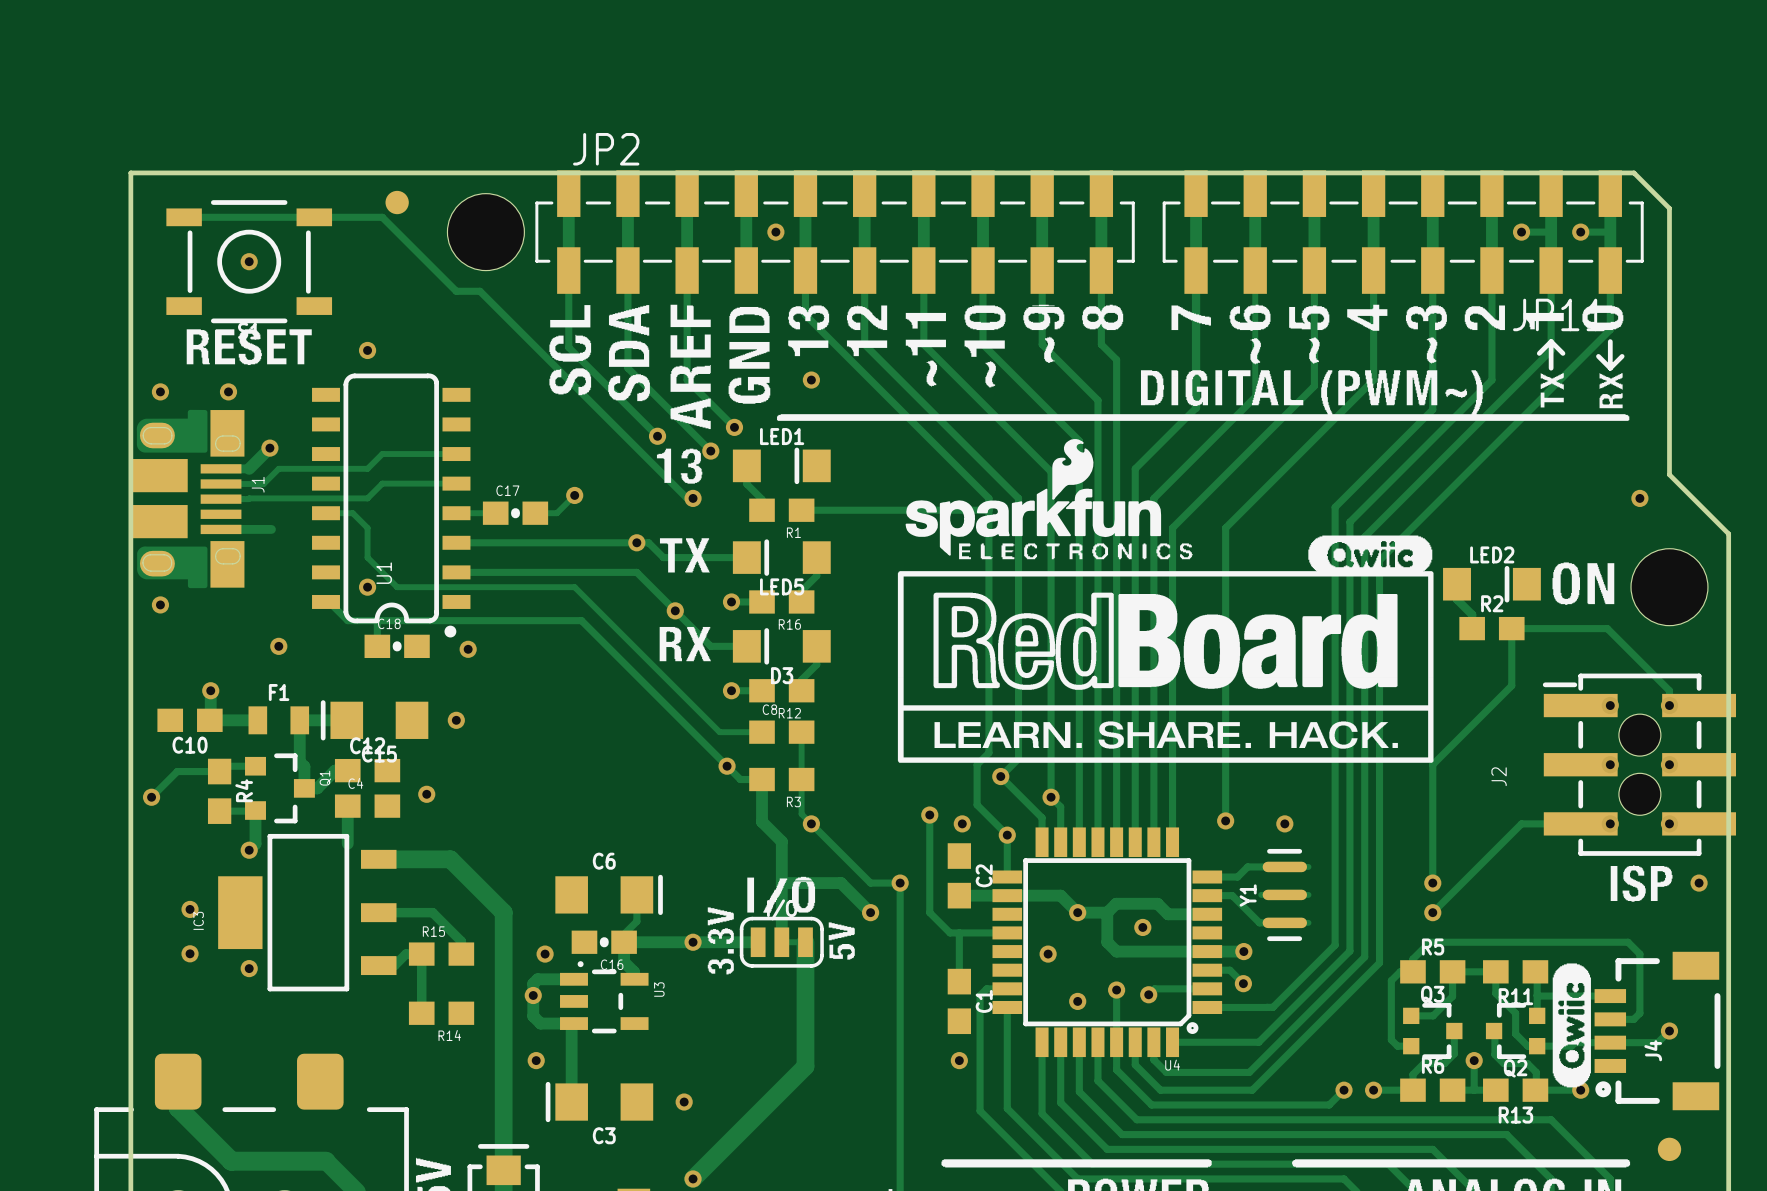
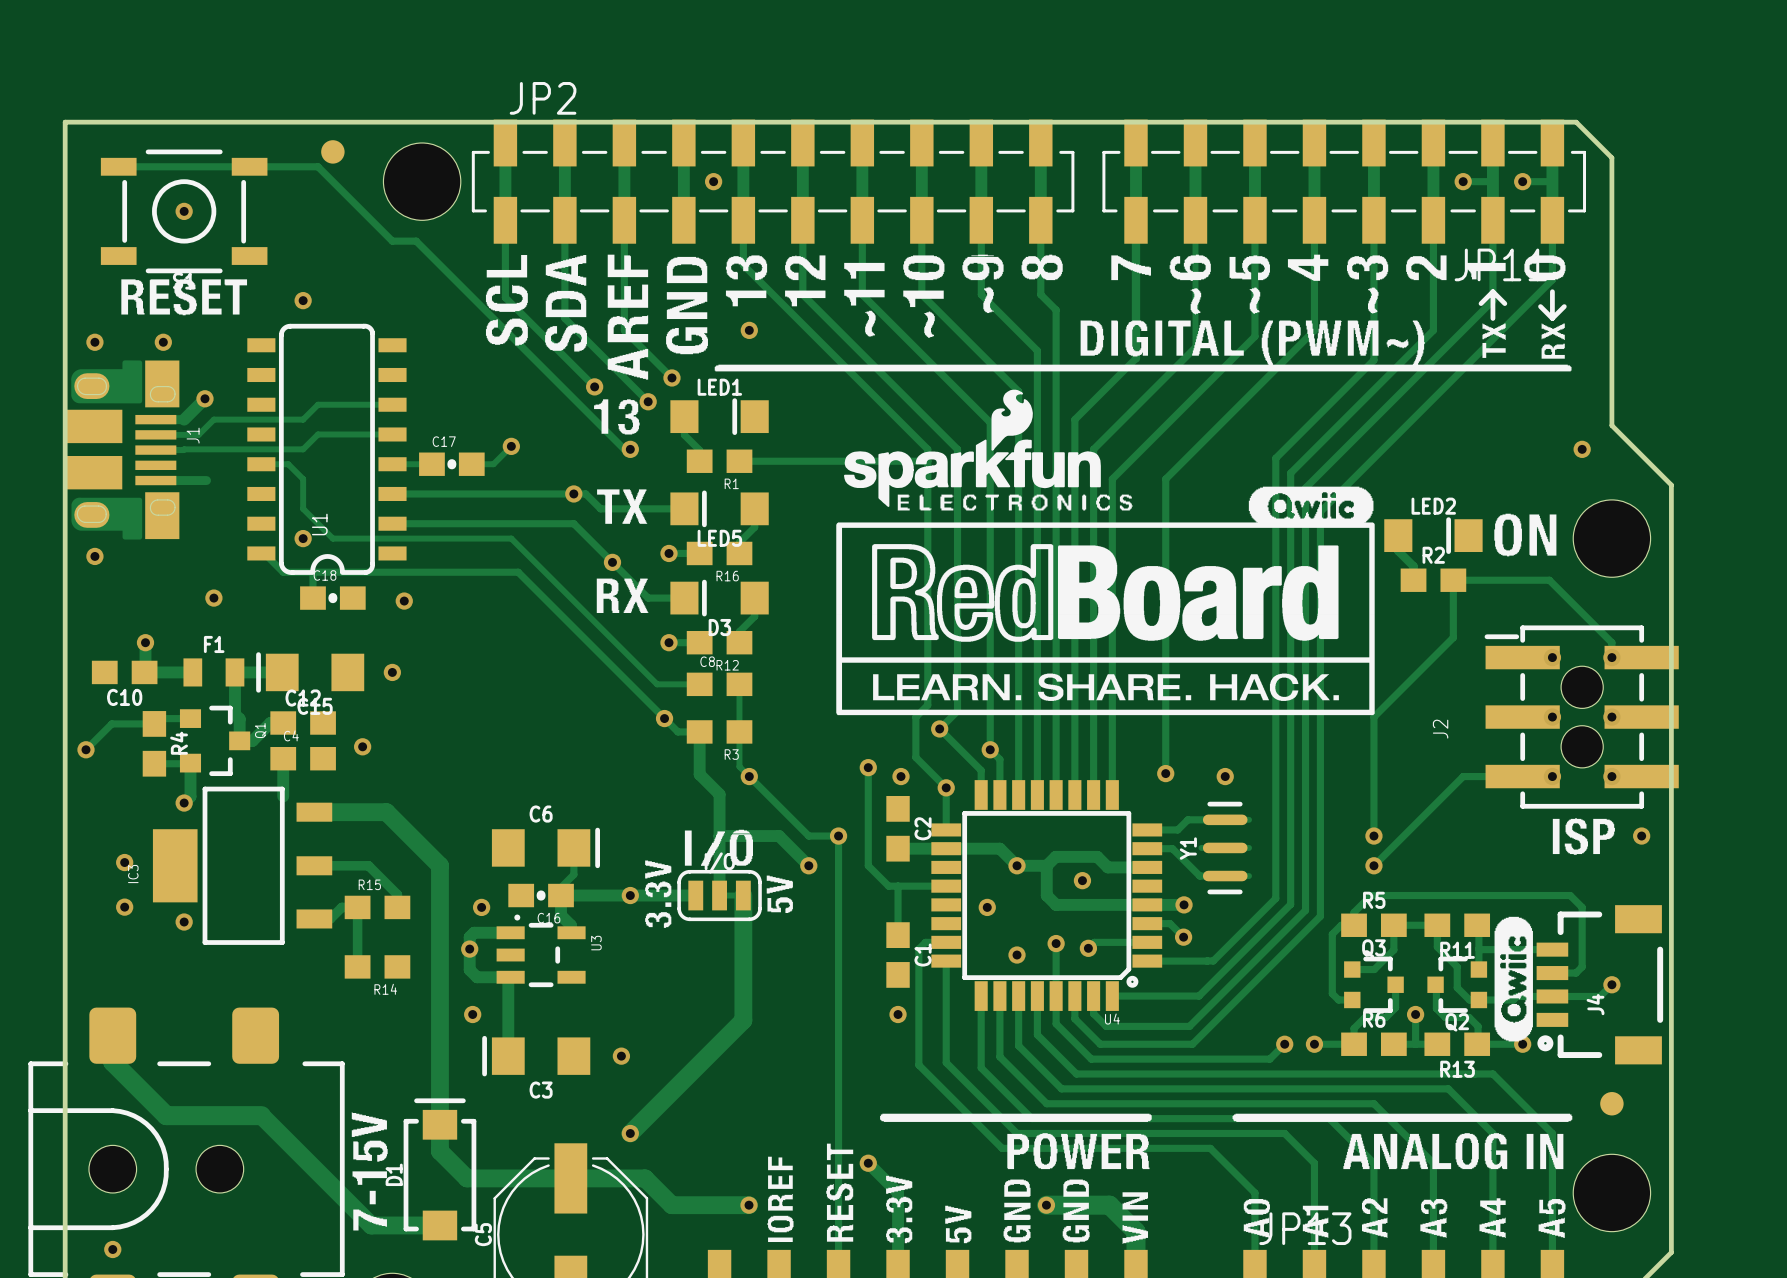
U1 footprint: [312, 373, 471, 638] -> [247, 323, 407, 575]

